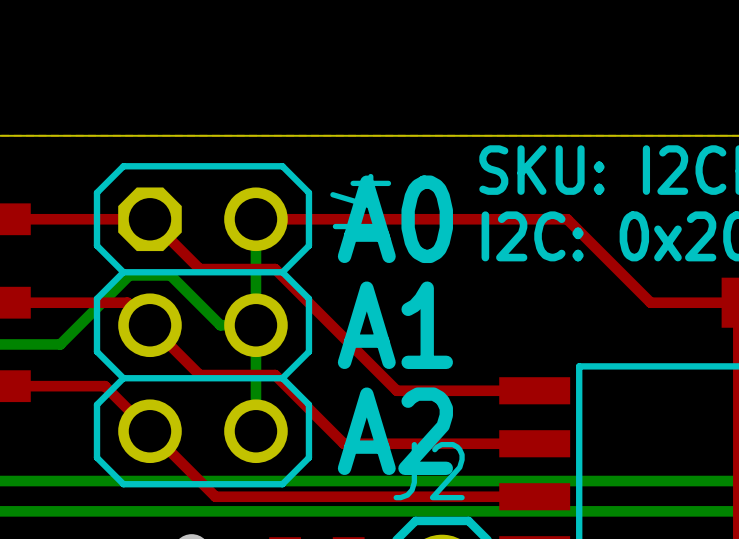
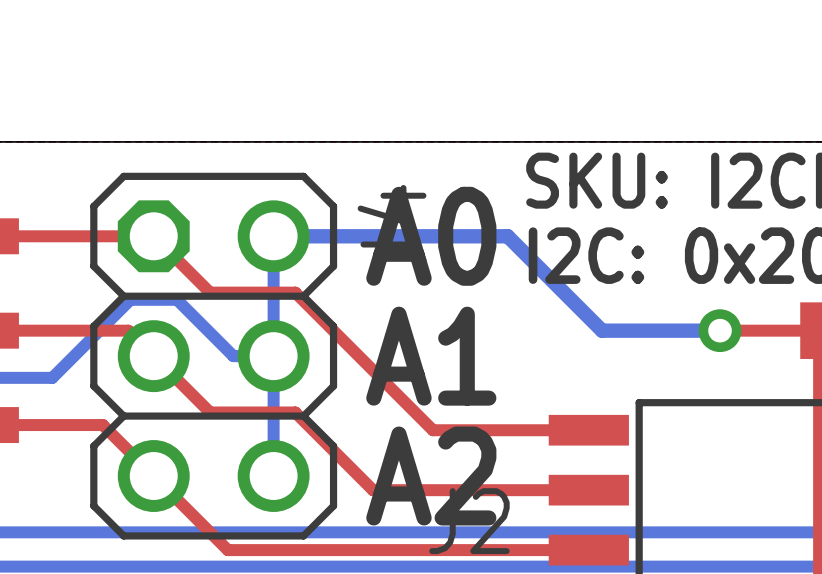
bottom track: none -> (273, 236) (507, 236) (602, 330) (720, 330)
top track: (255, 219) (567, 219) (650, 302) -> none
via: none -> (720, 330)

